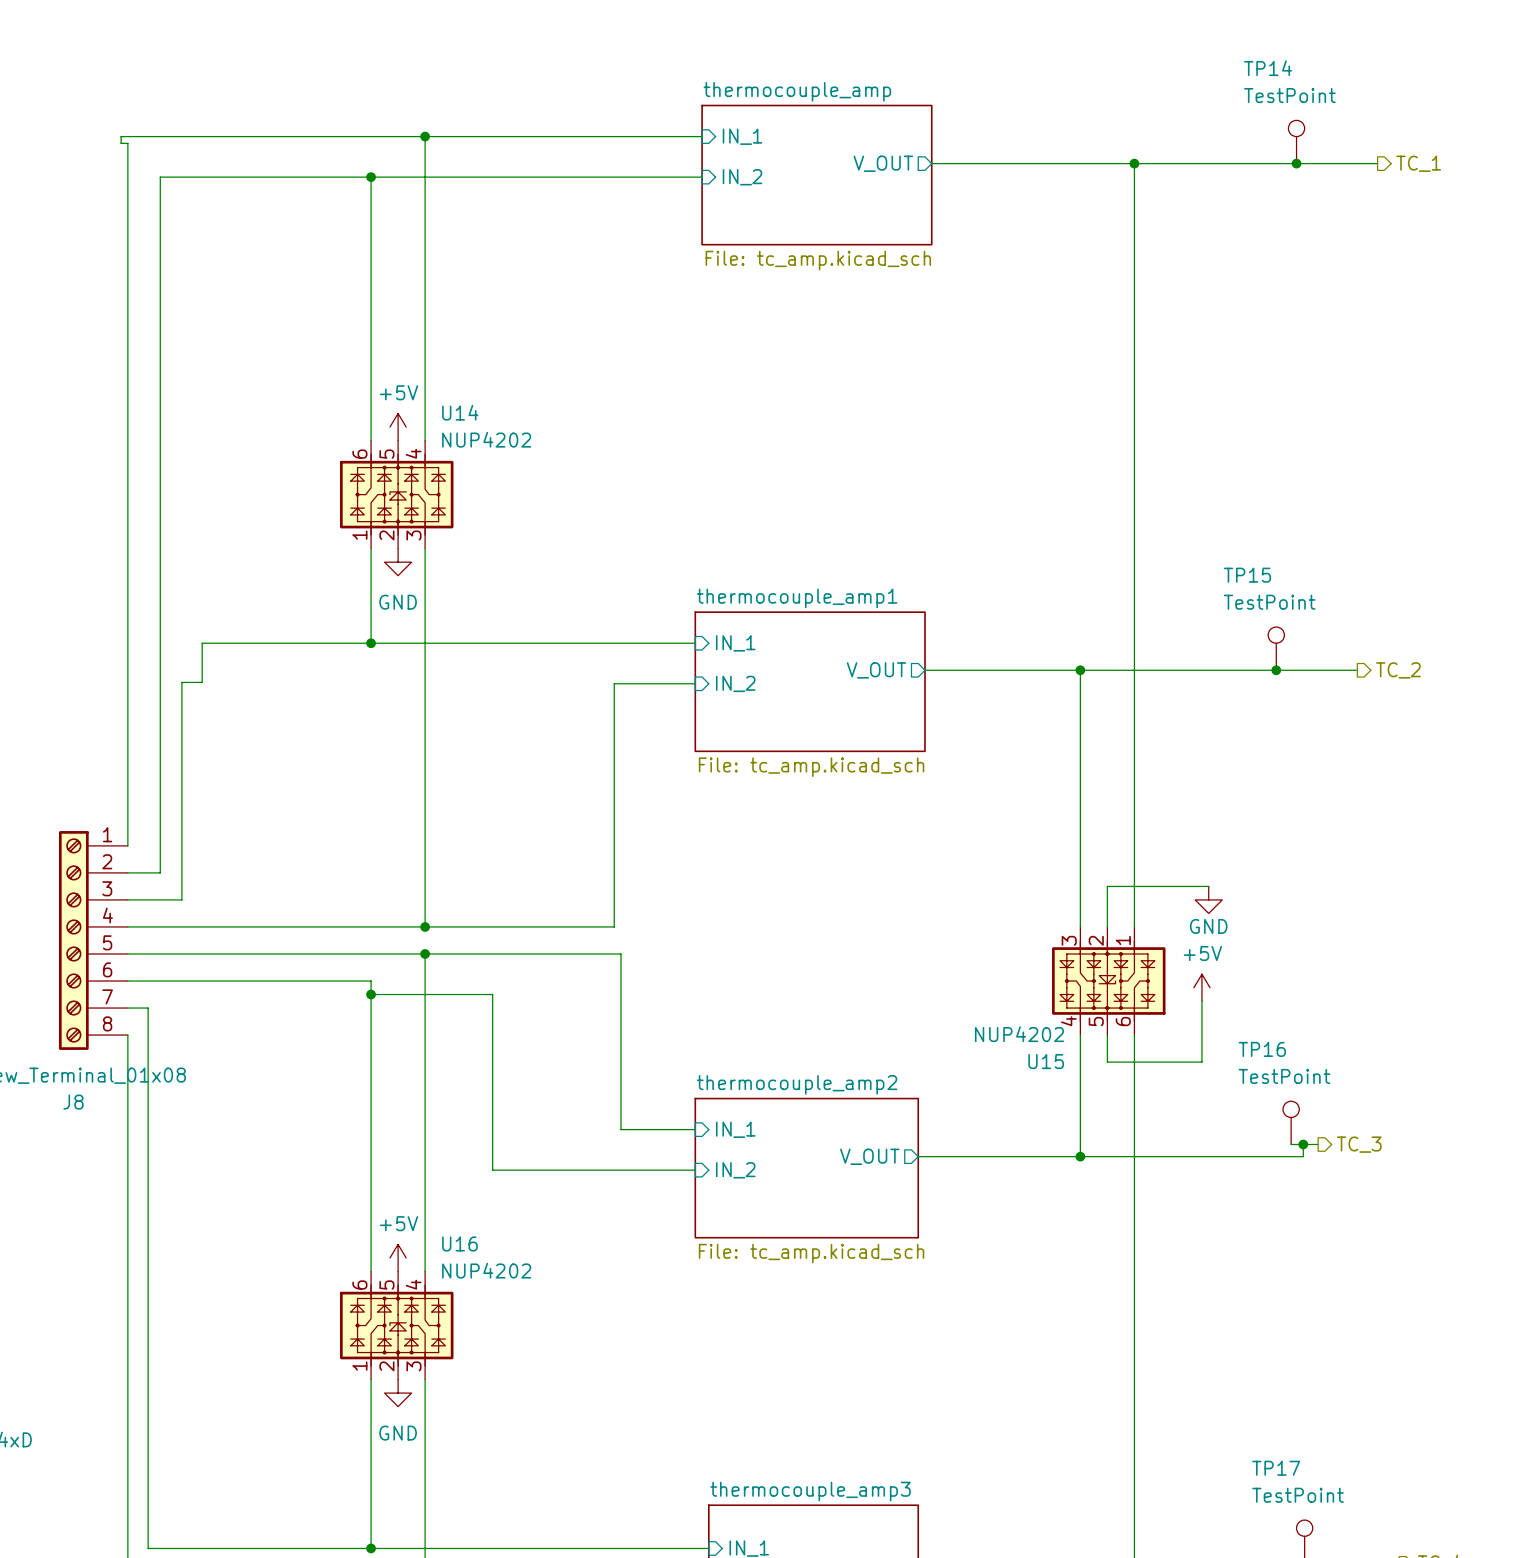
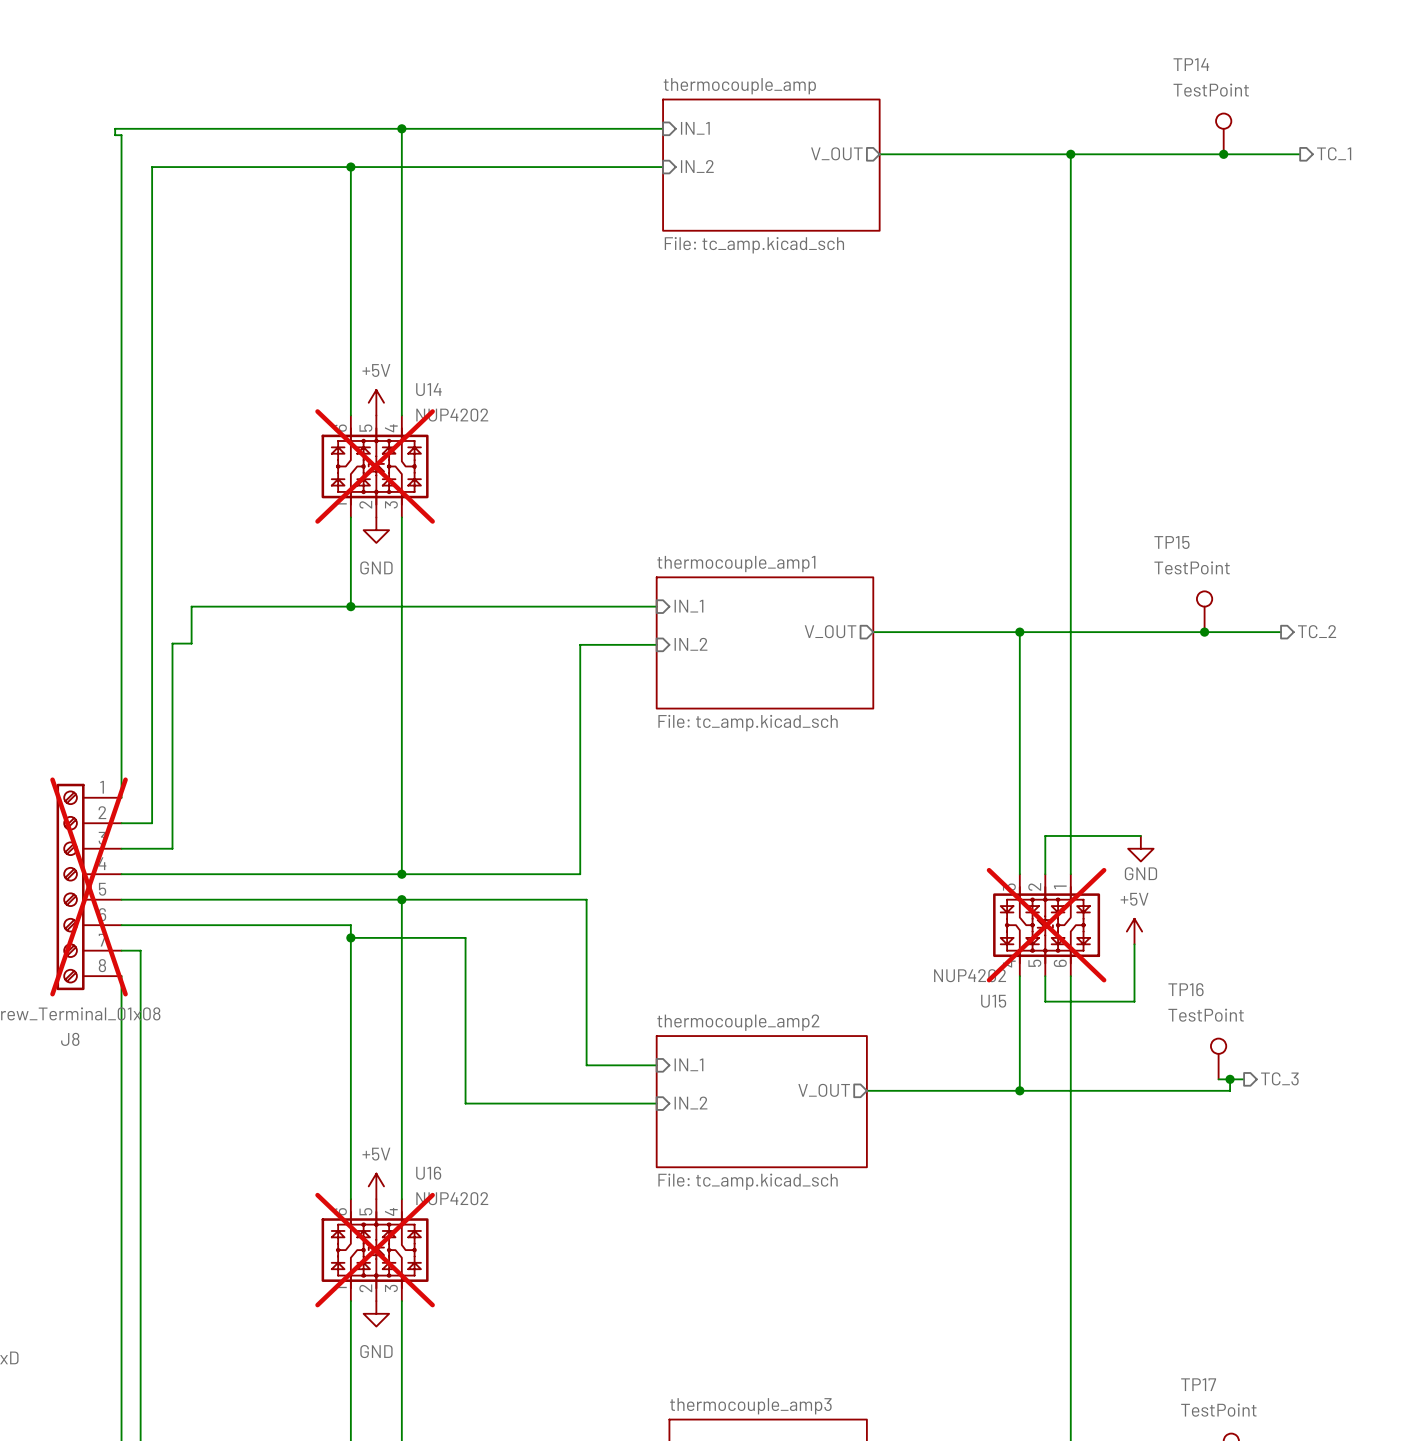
U14 do-not-place cross: none -> (375, 466)
J8 do-not-place cross: none -> (89, 886)
U15 do-not-place cross: none -> (1046, 925)
U16 do-not-place cross: none -> (375, 1250)

